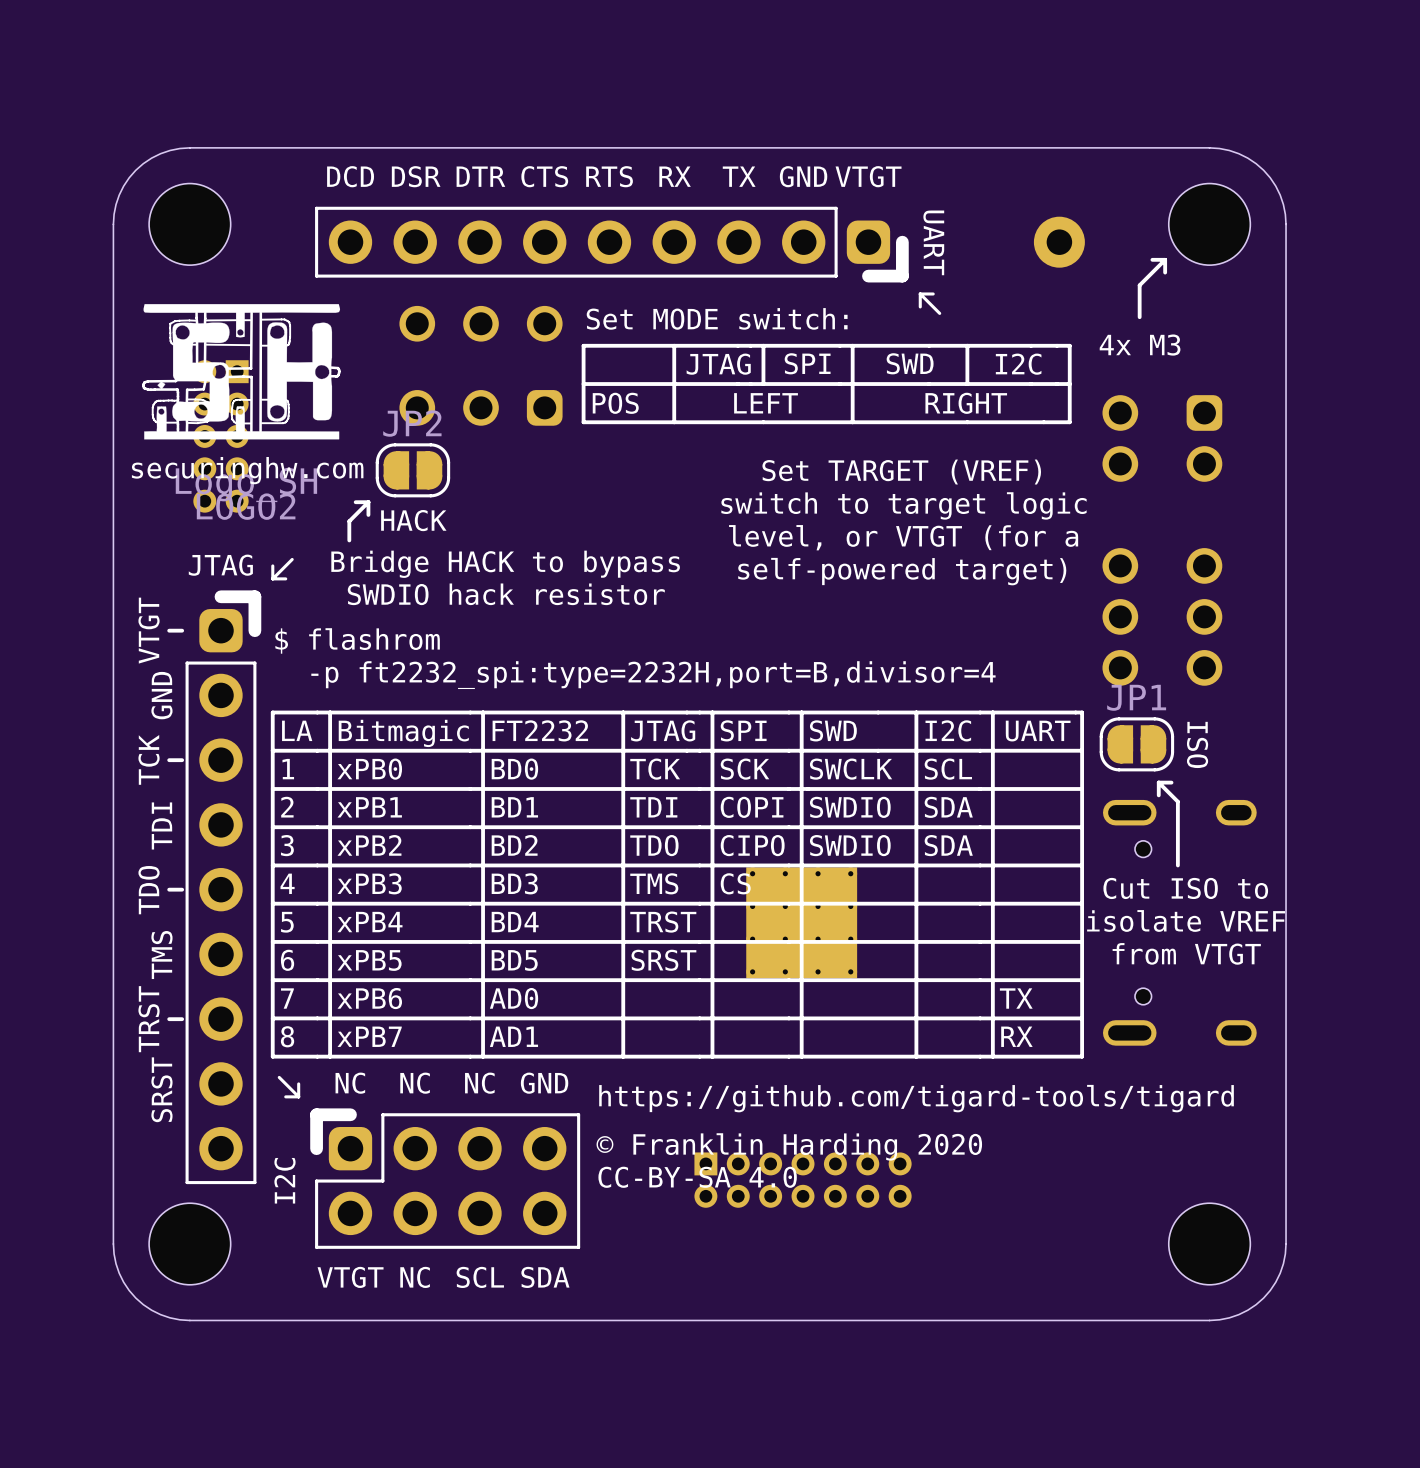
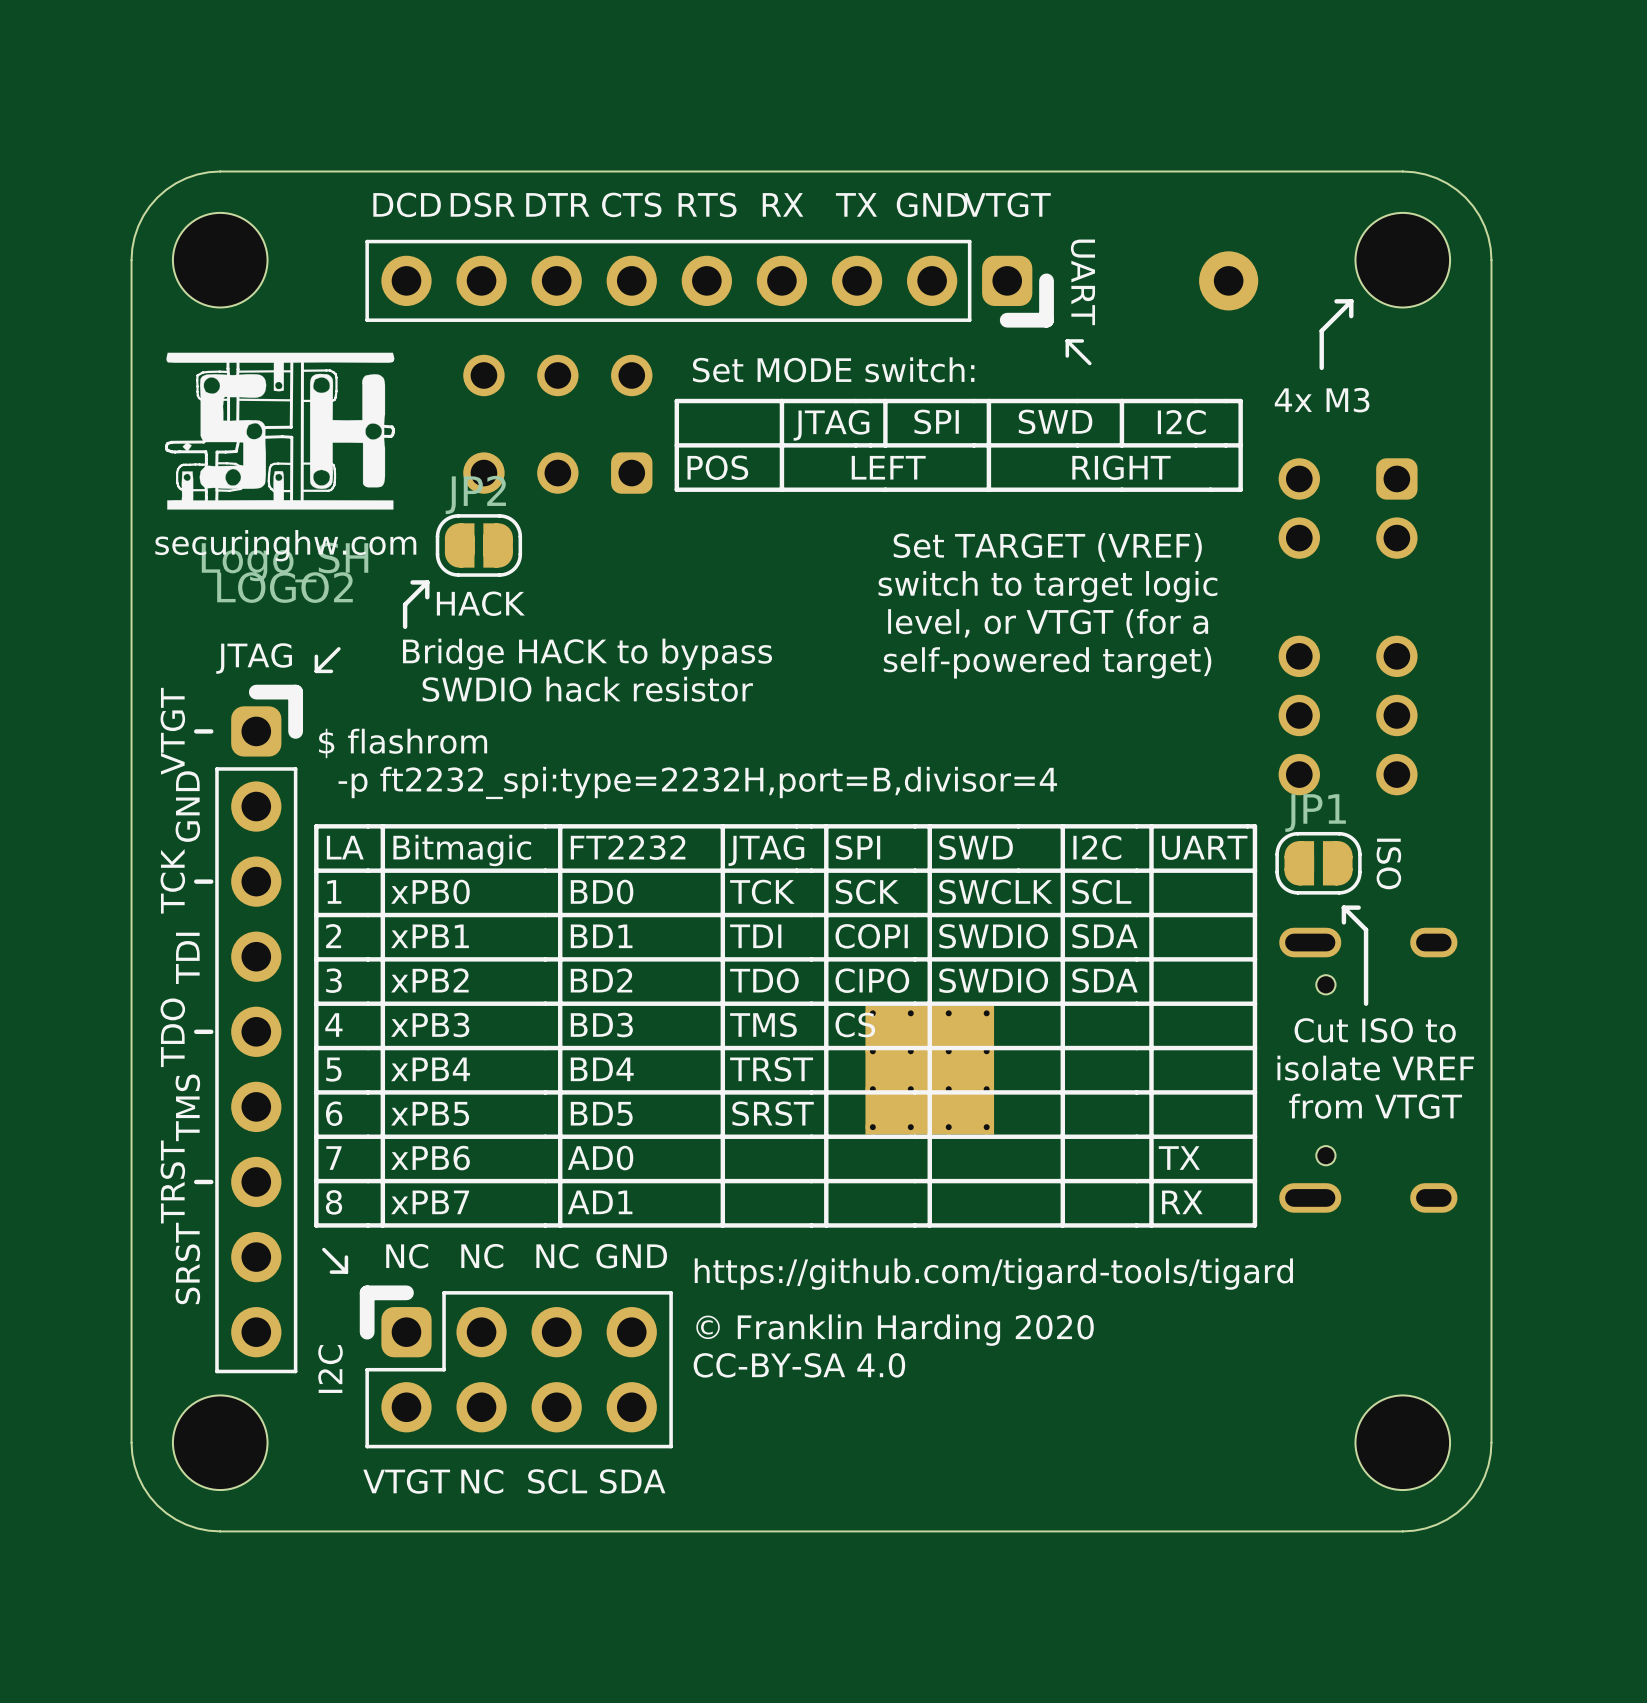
part: (220, 436) -> none
part: (803, 1180) -> none

